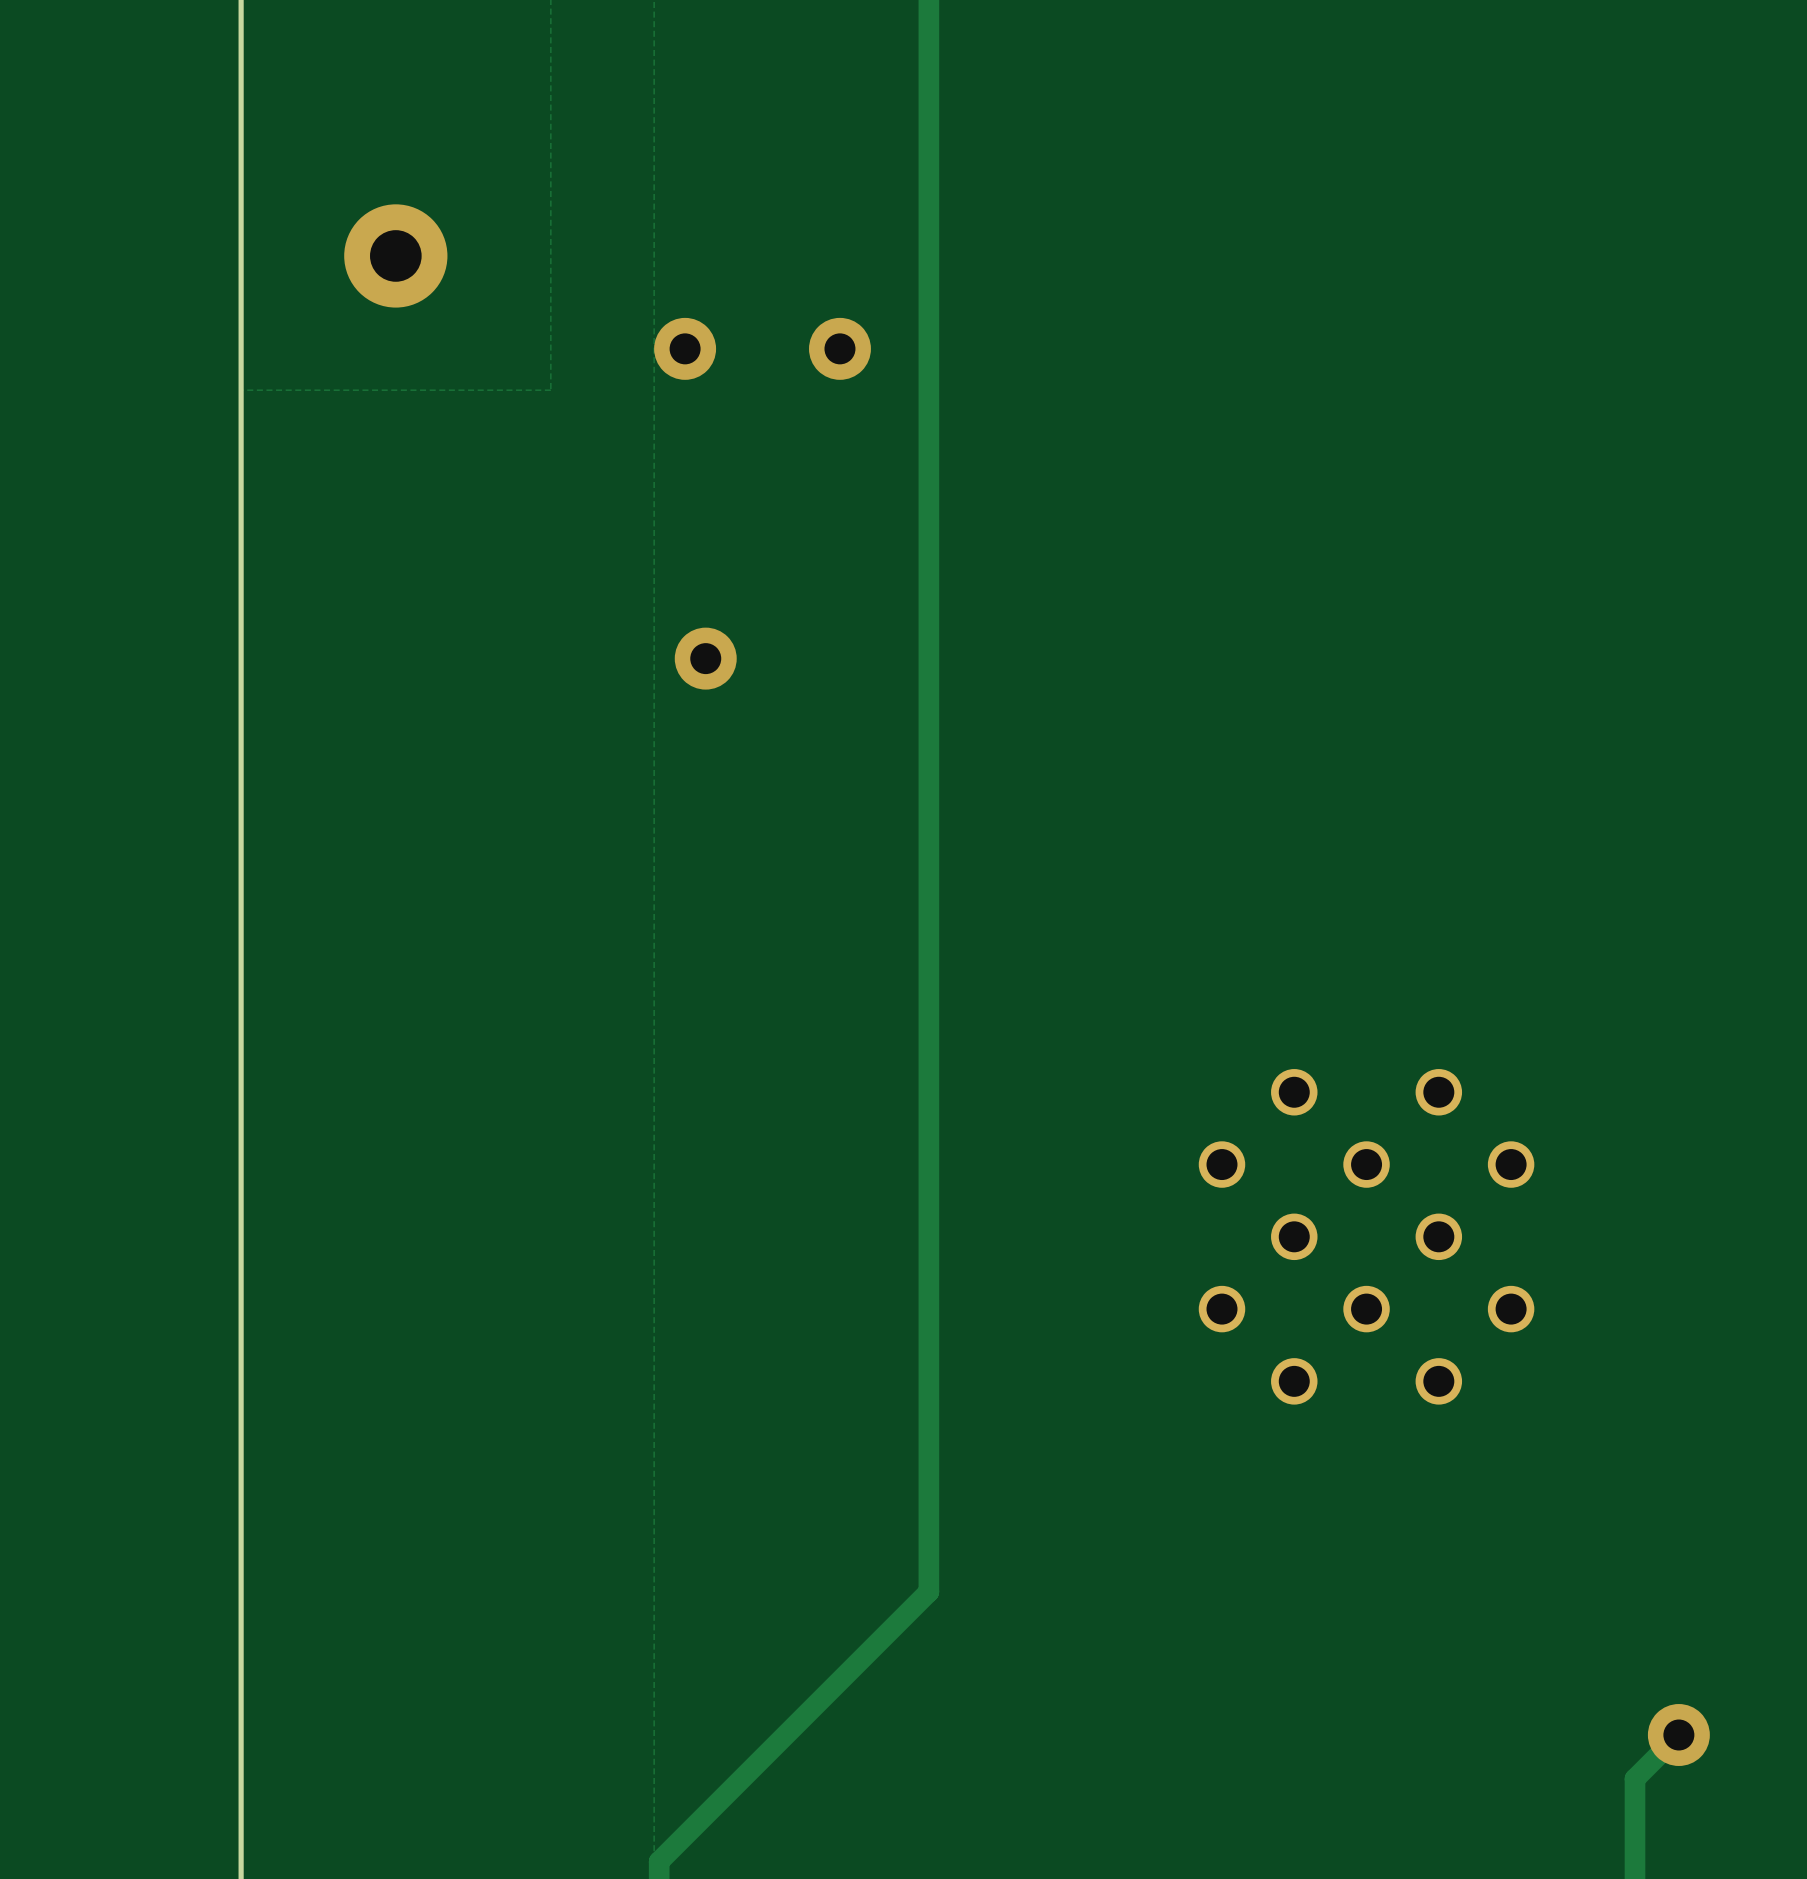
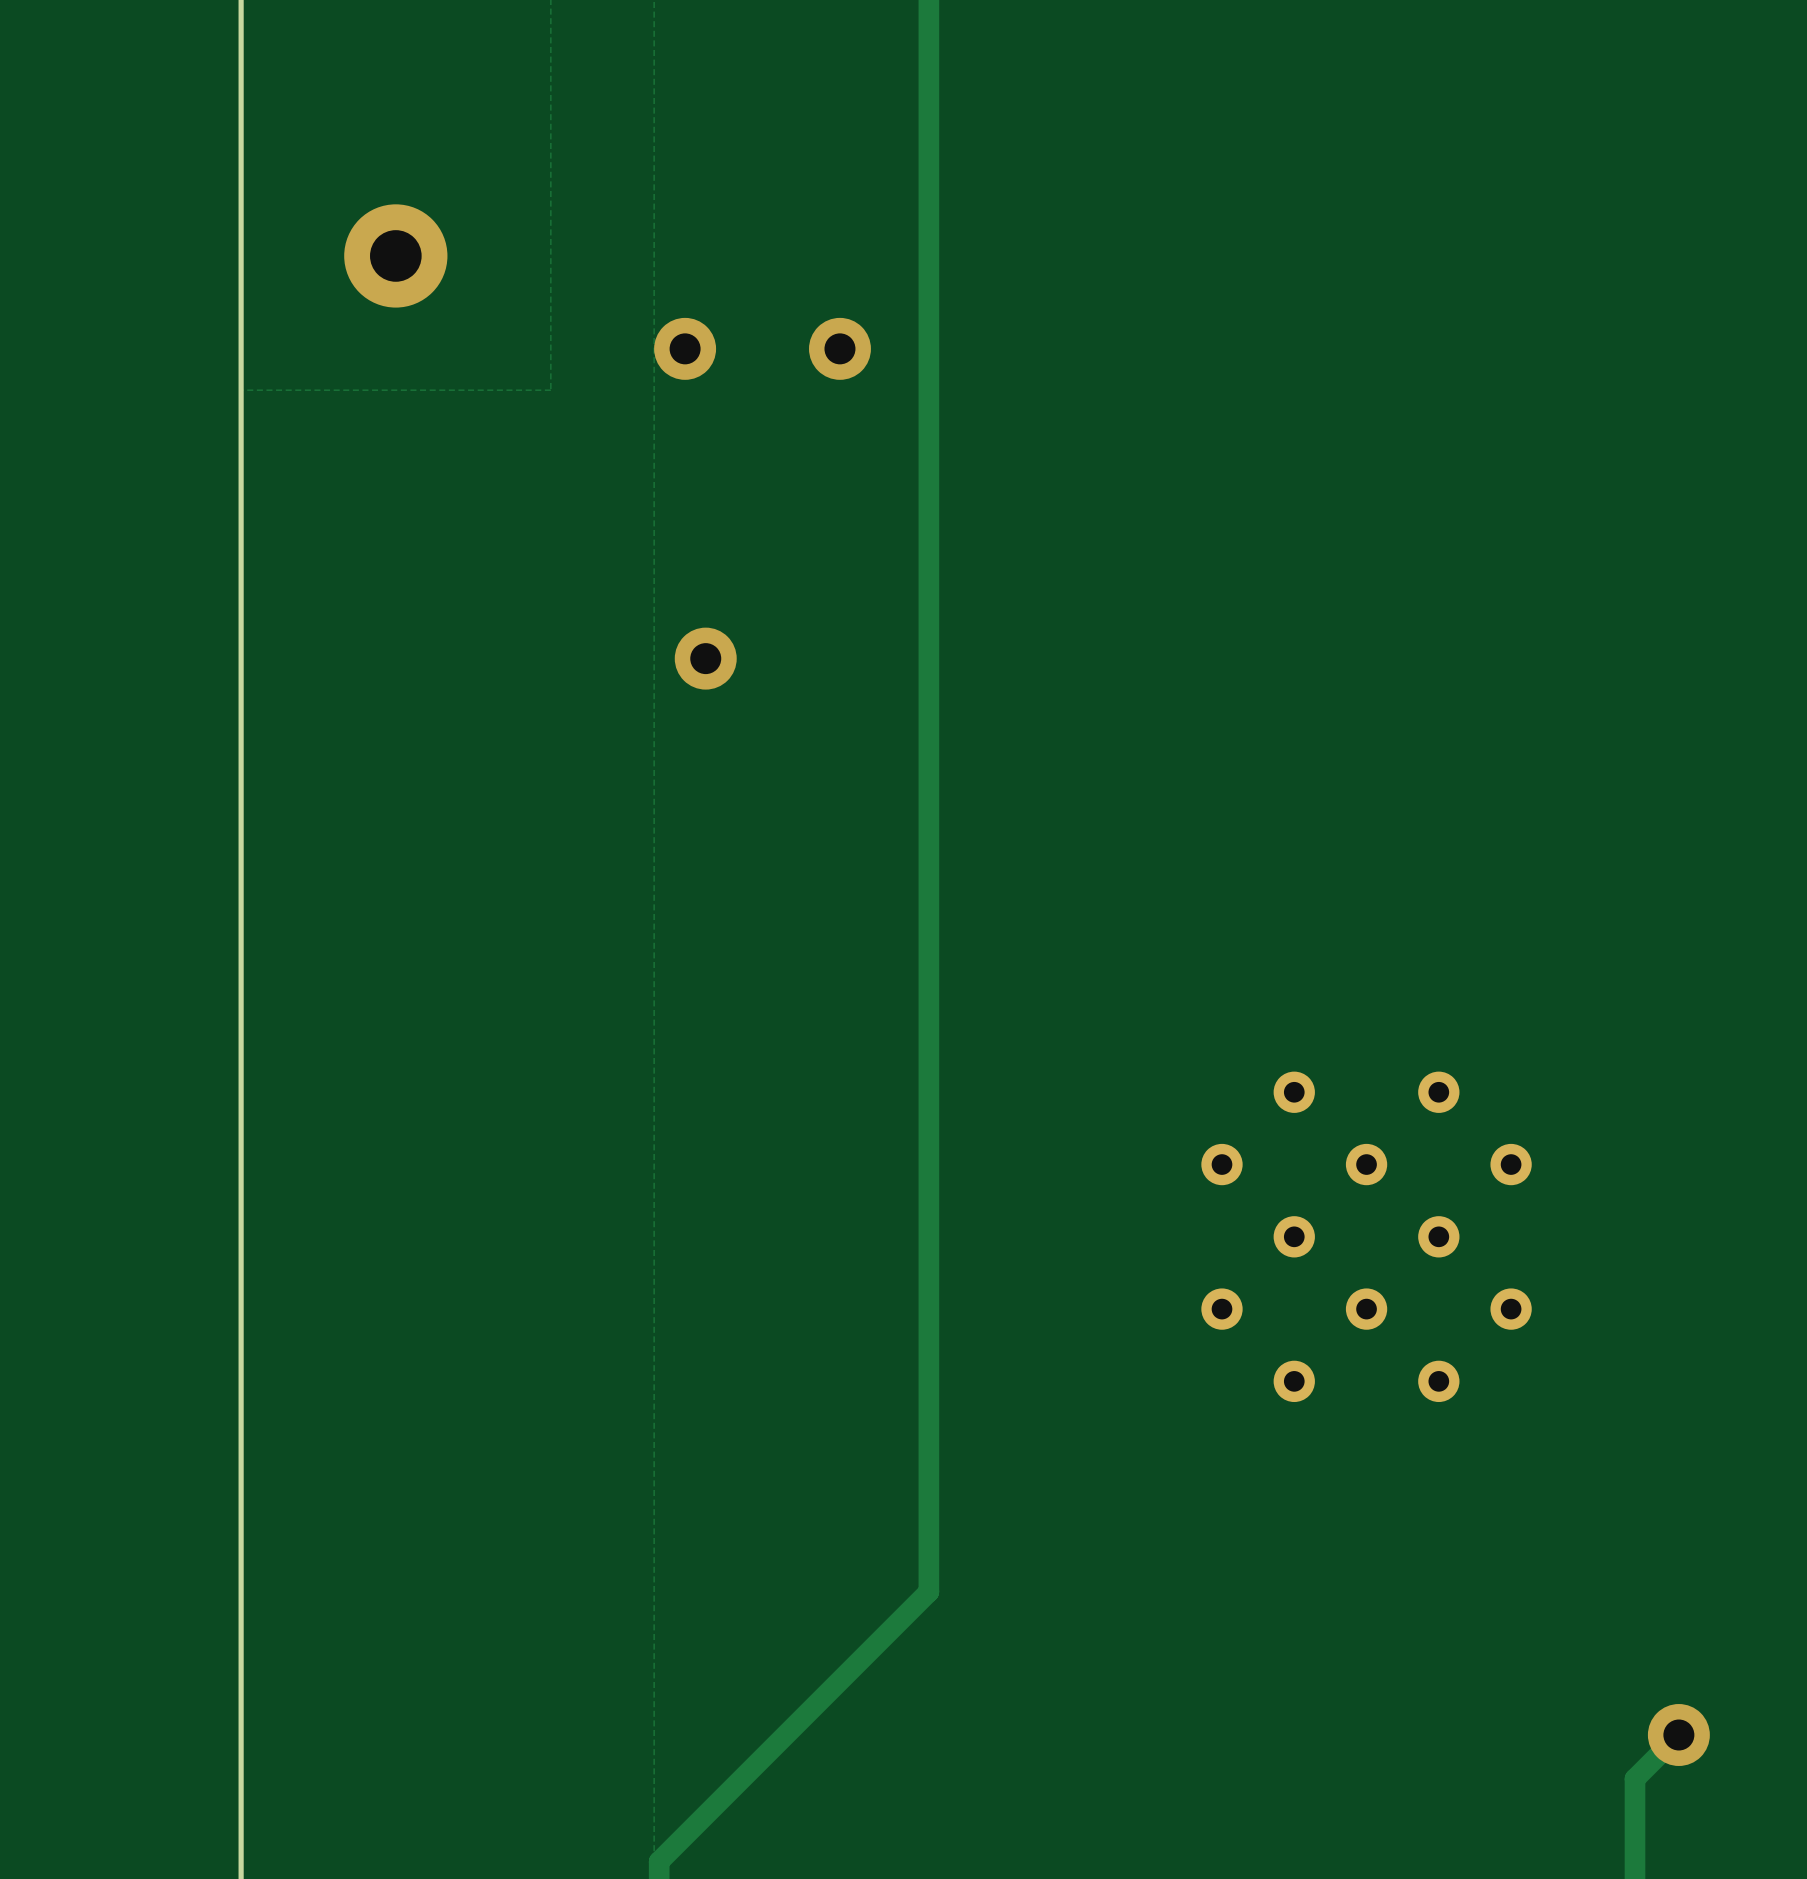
part footprint: [1198, 1069, 1535, 1405] -> [1201, 1071, 1532, 1403]

